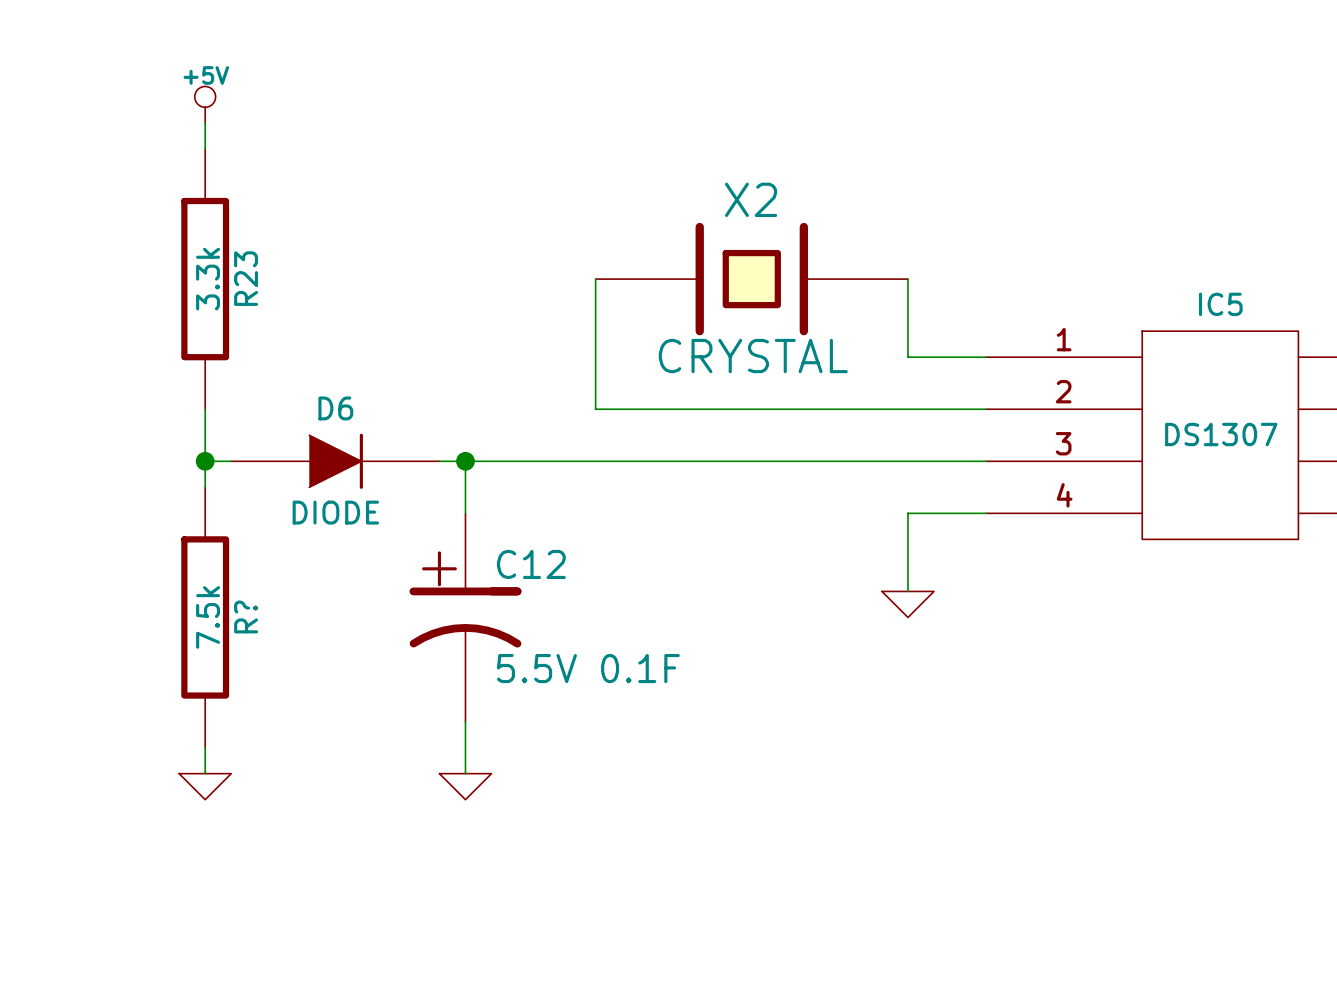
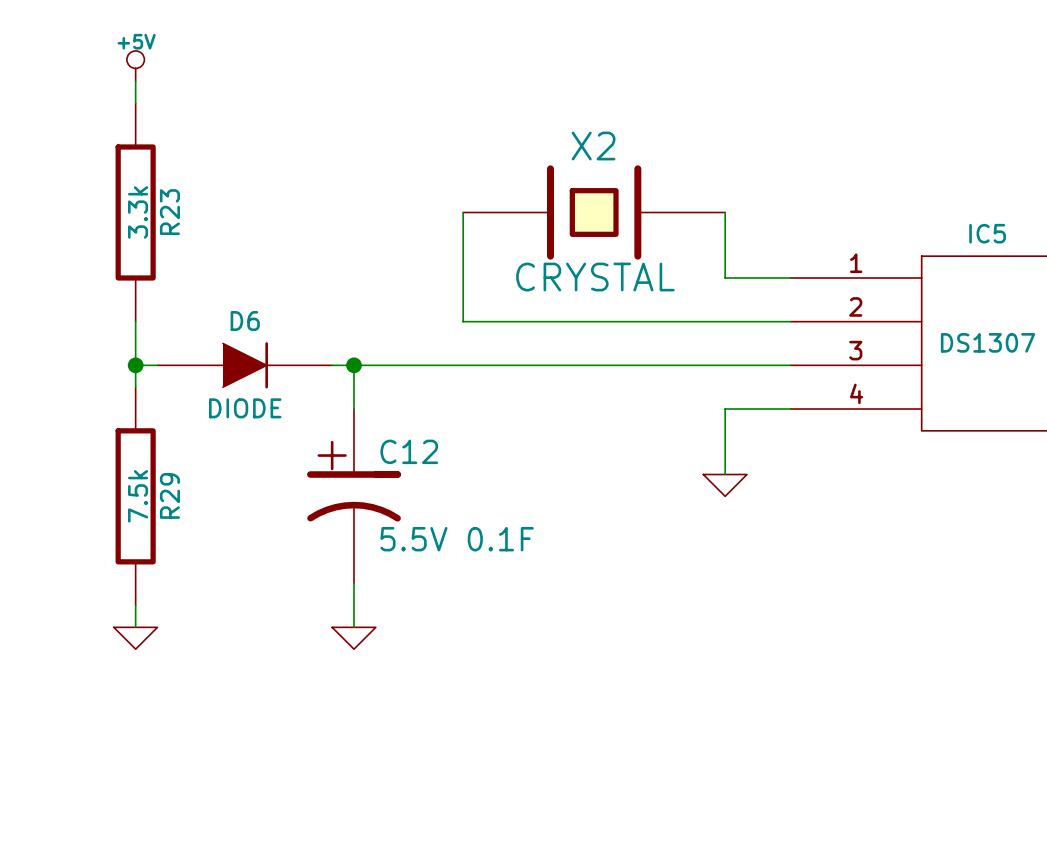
R? name: R? (246, 616) -> R29 (169, 495)

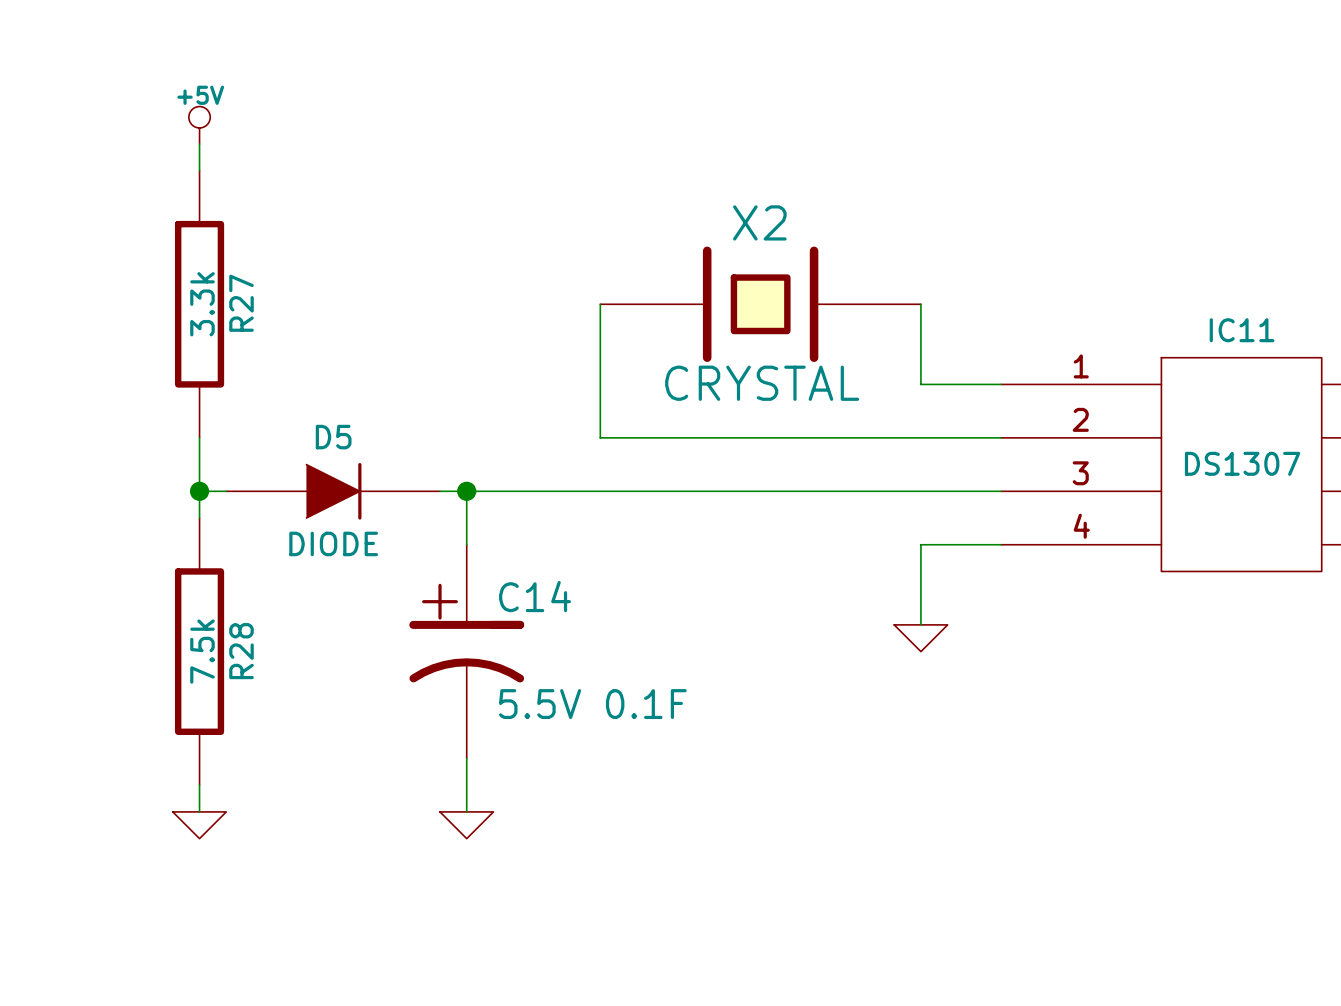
R23 name: R23 (169, 212) -> R27 (241, 303)
IC5 name: IC5 (987, 233) -> IC11 (1242, 330)
D6 name: D6 (245, 321) -> D5 (333, 437)
C12 name: C12 (409, 451) -> C14 (535, 596)
R29 name: R29 (169, 495) -> R28 (241, 651)

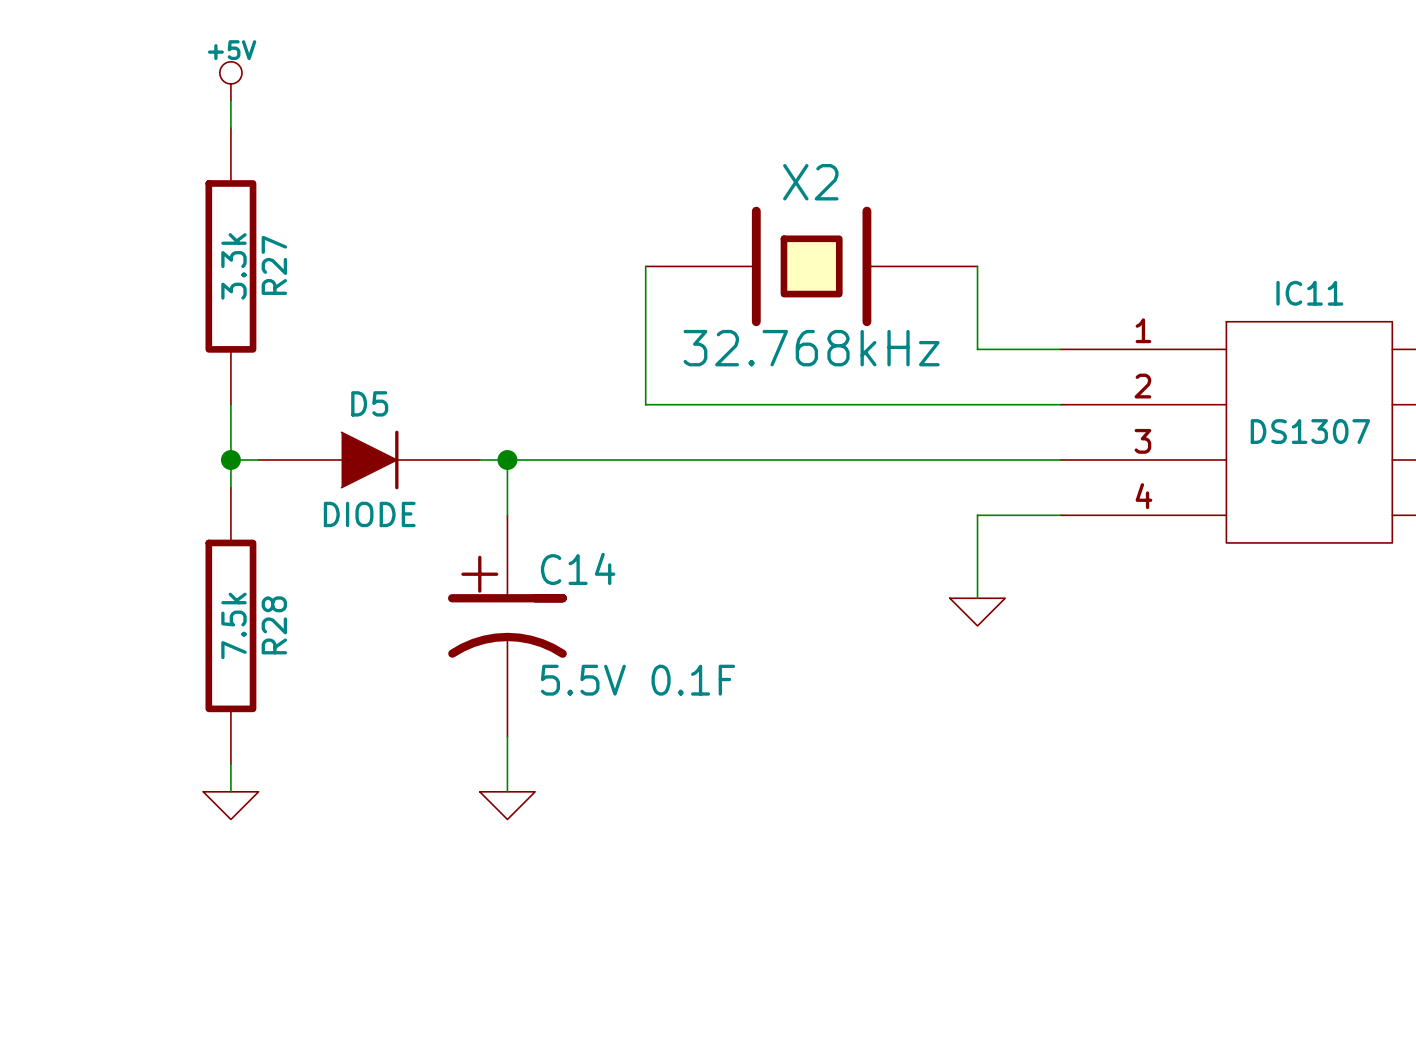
X2 value: CRYSTAL (762, 383) -> 32.768kHz (811, 348)

